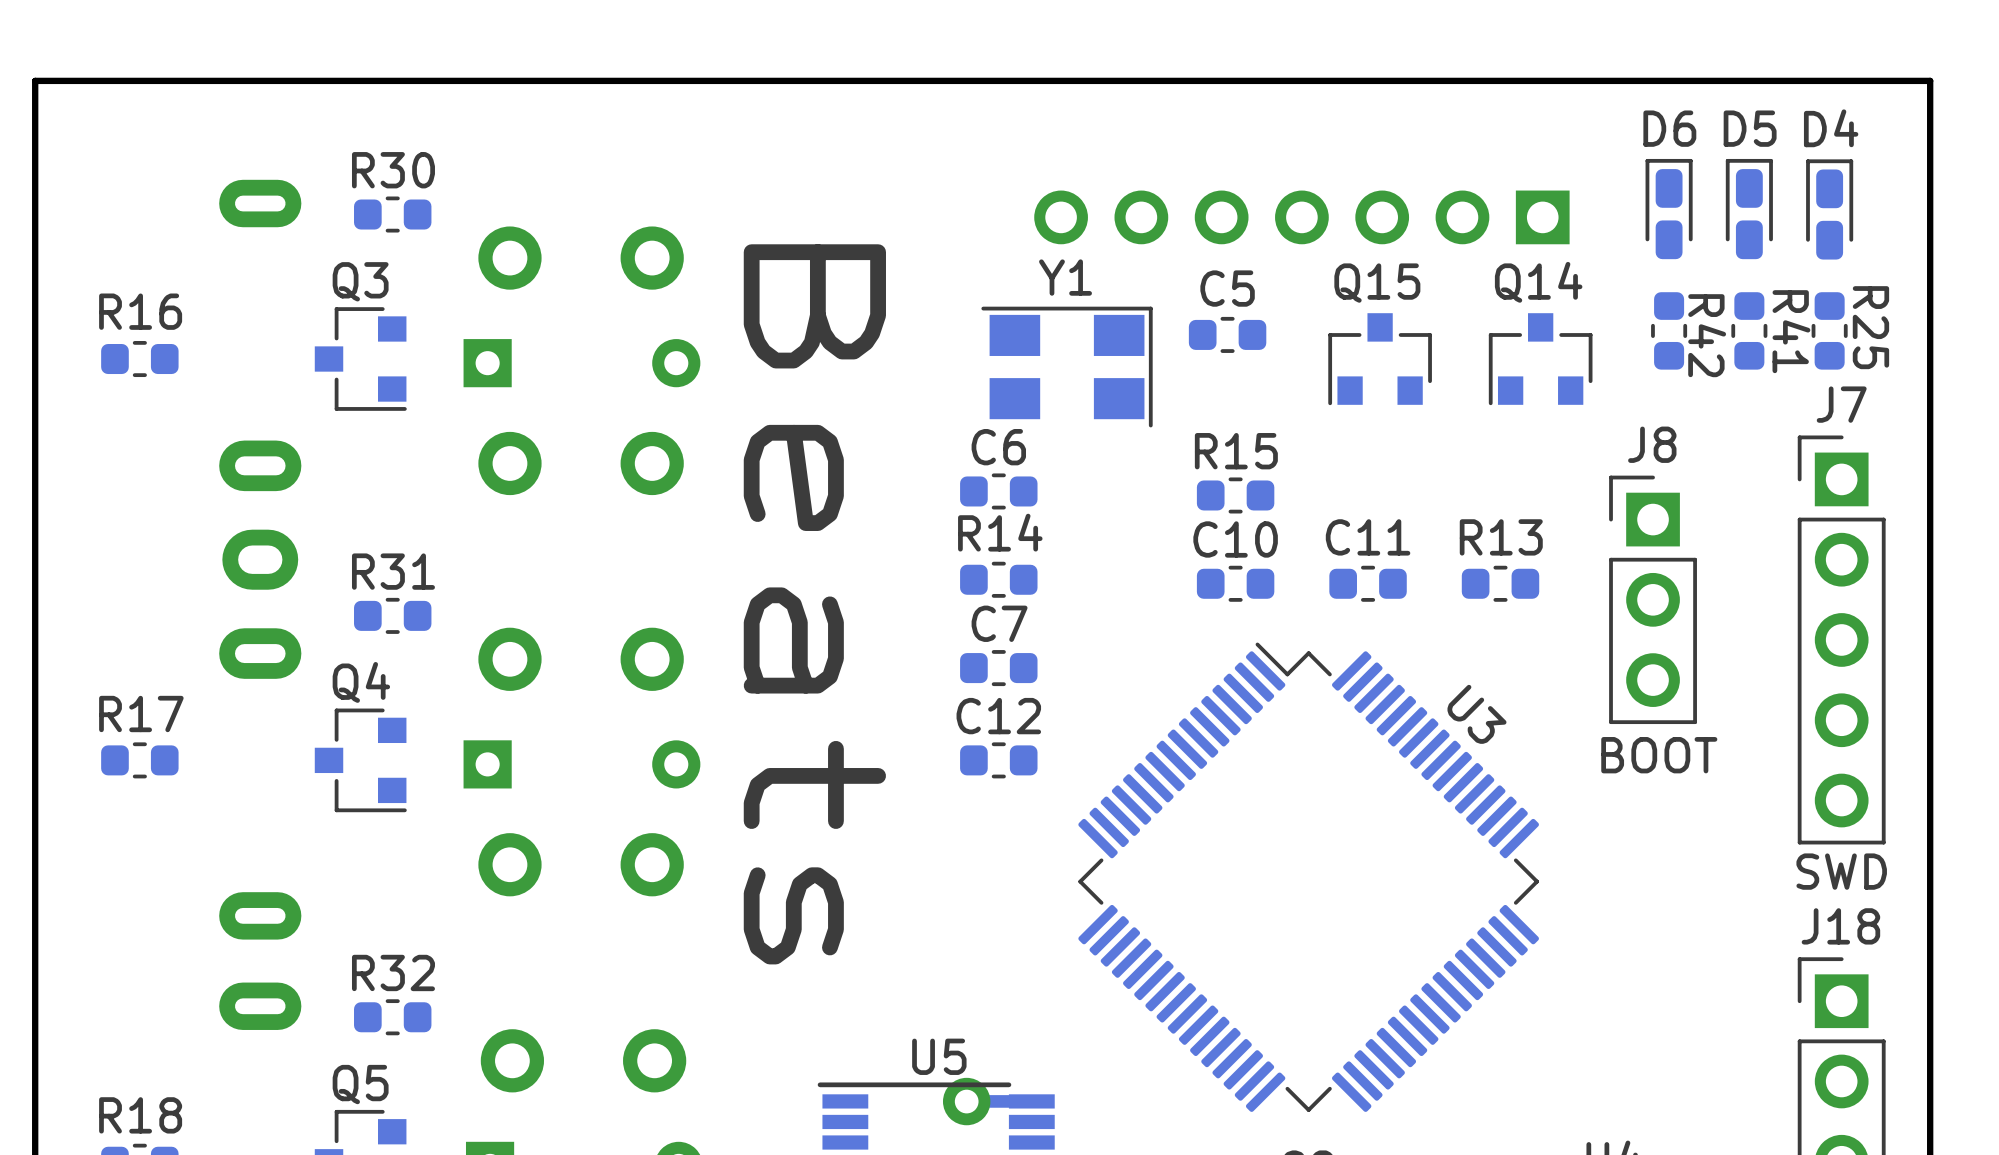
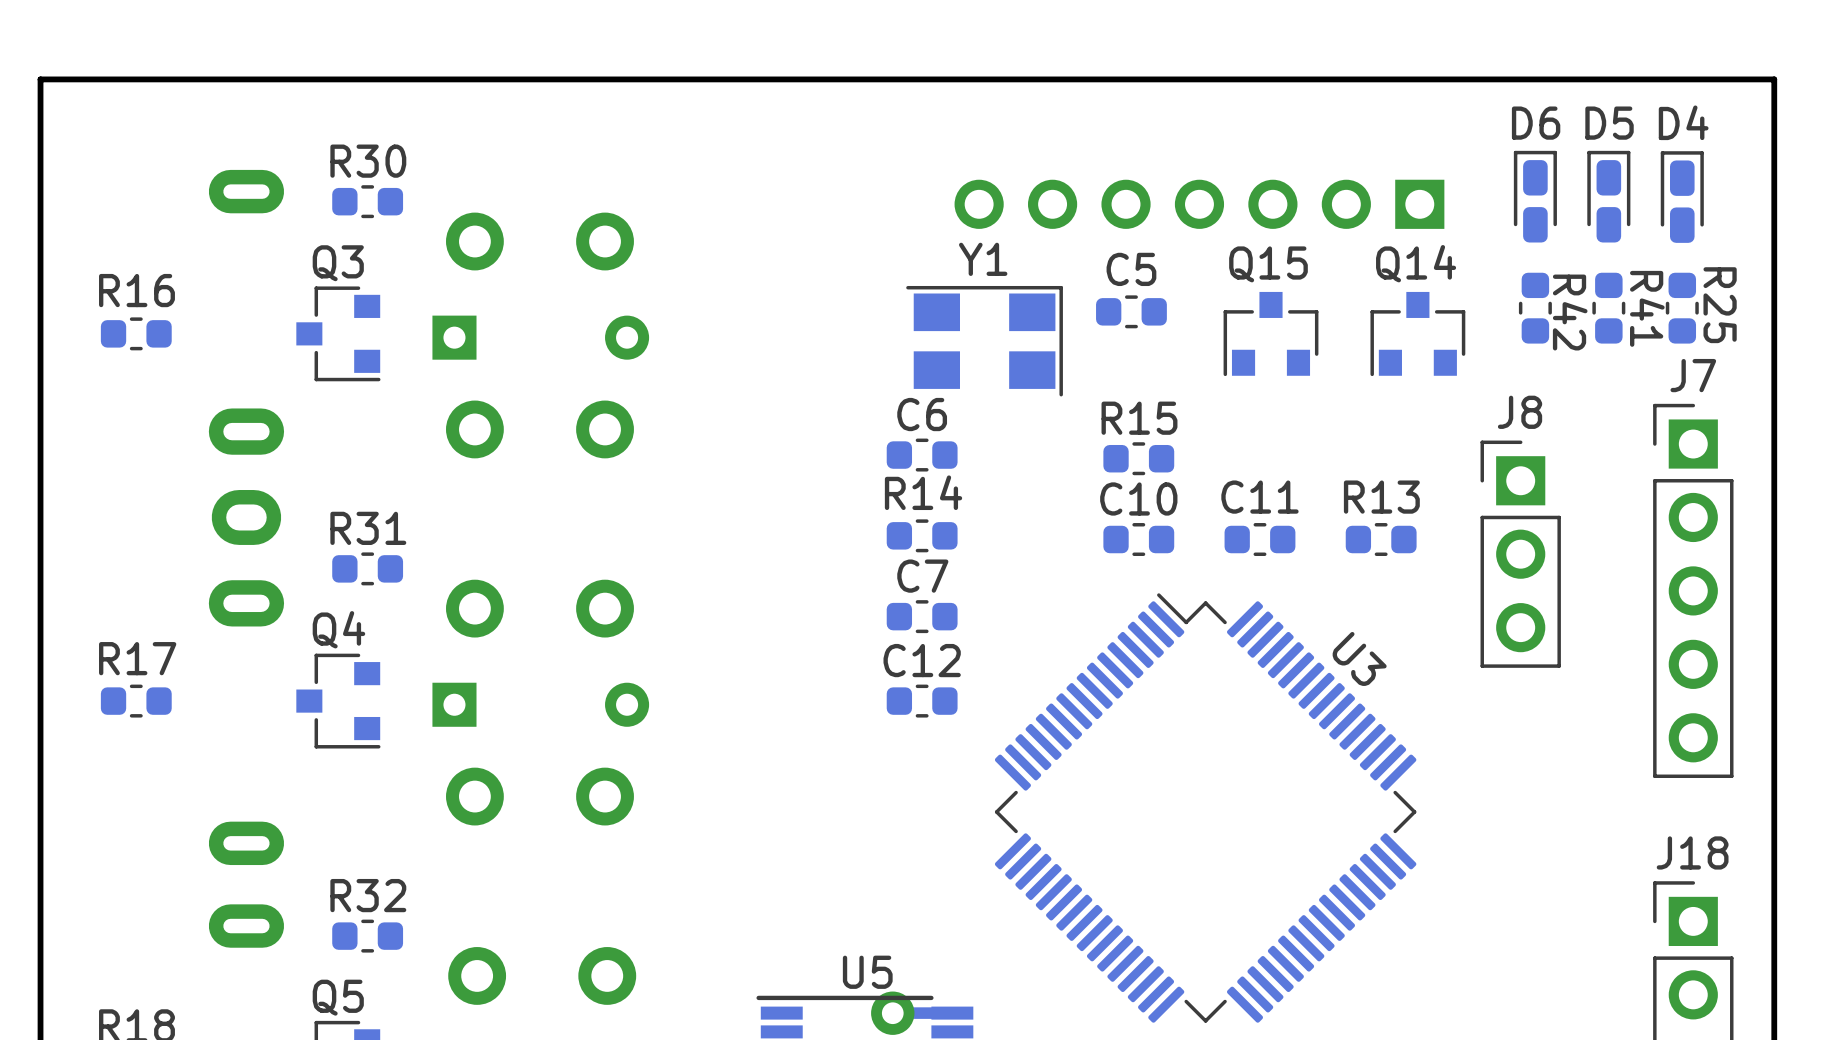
text: Beats (814, 604) -> none
text: BOOT (1659, 755) -> none
text: SWD (1841, 871) -> none

